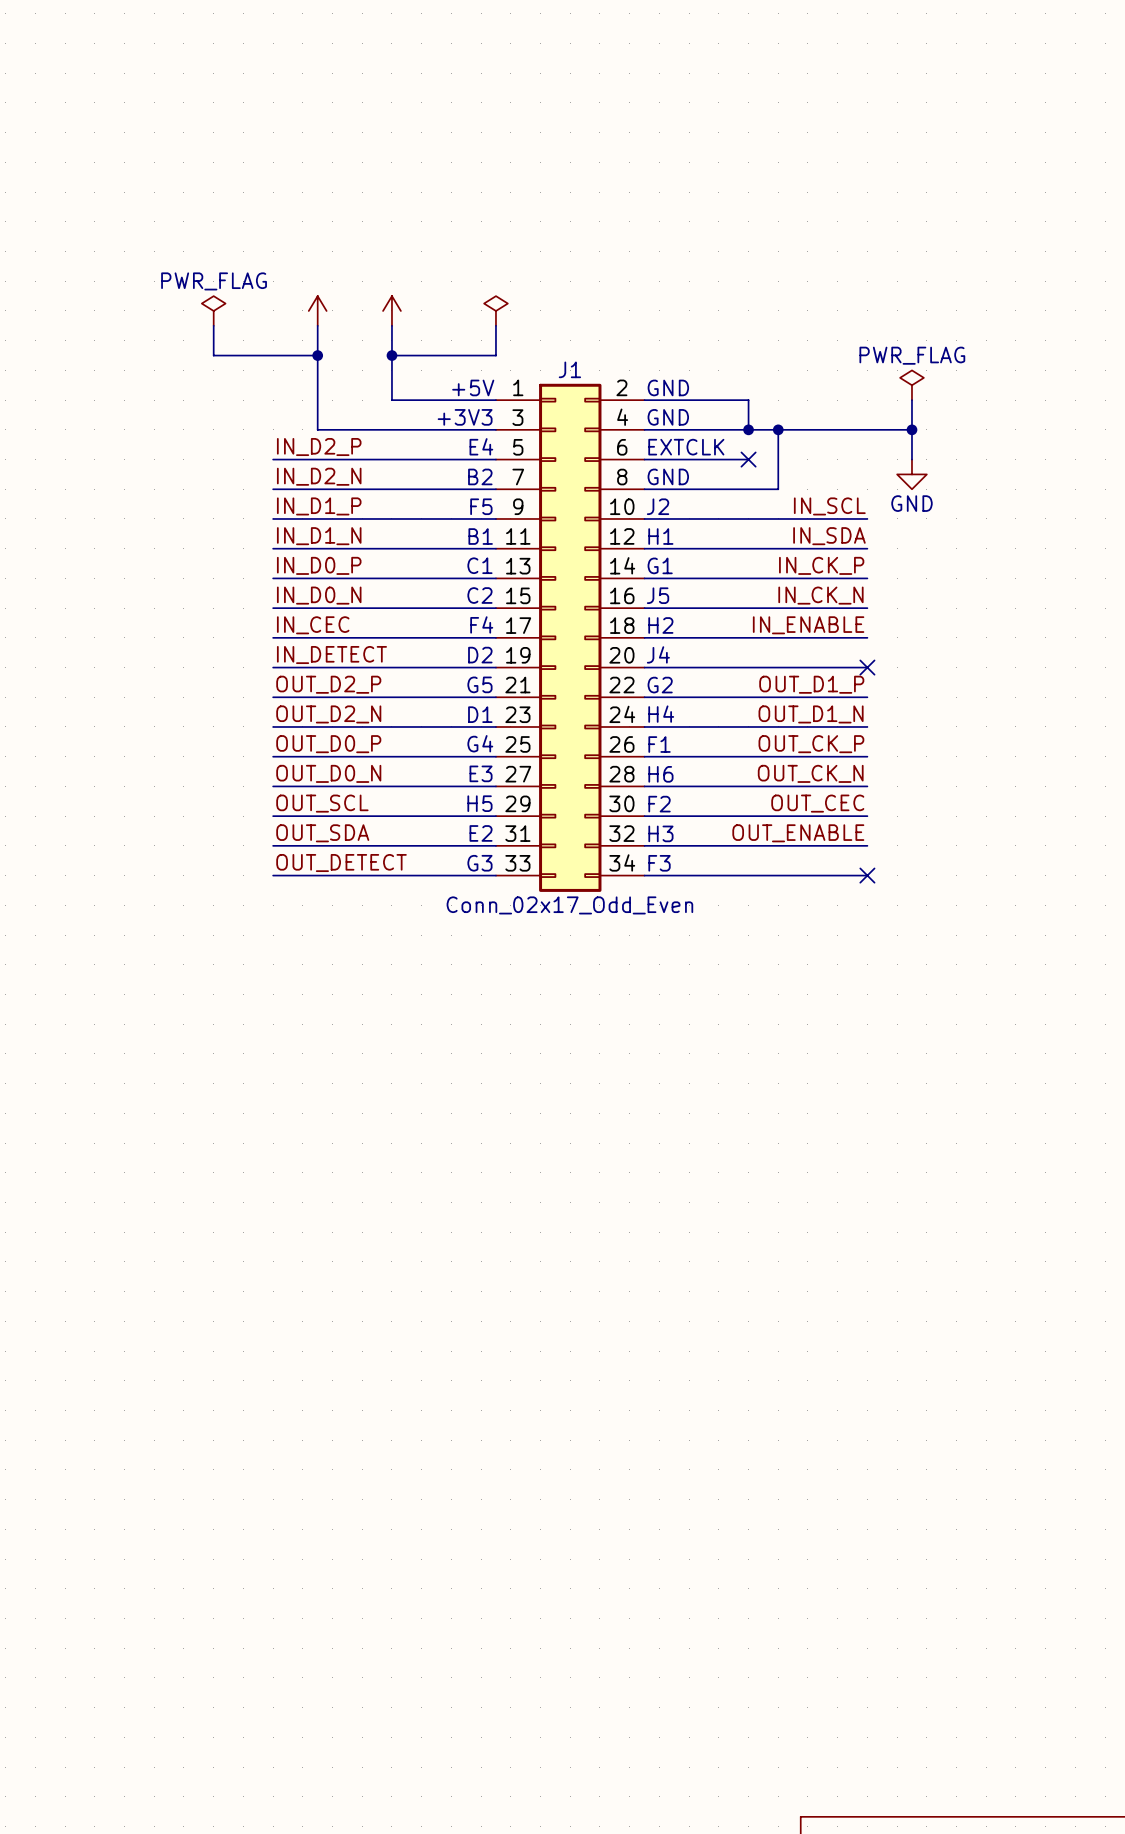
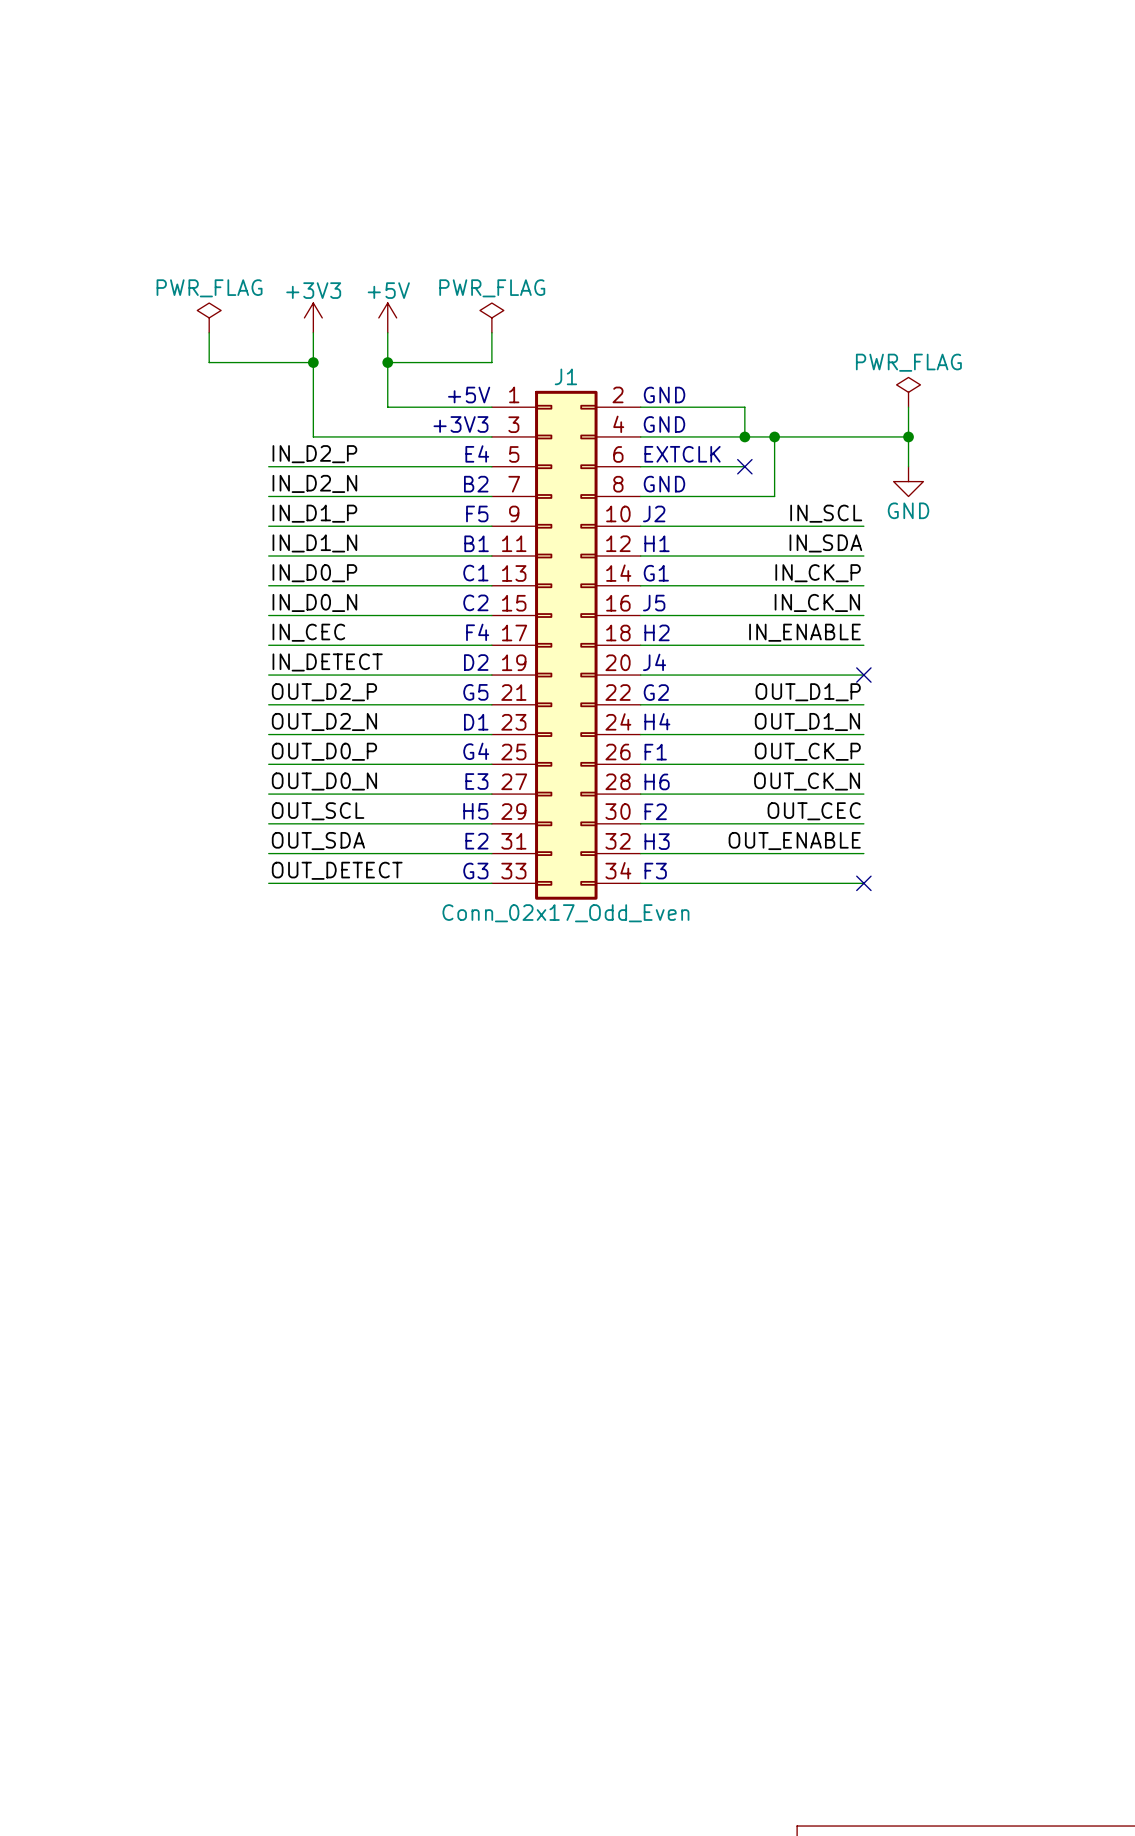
power symbol text: none -> PWR_FLAG (492, 288)
power symbol text: none -> +3V3 (313, 290)
power symbol text: none -> +5V (388, 290)

